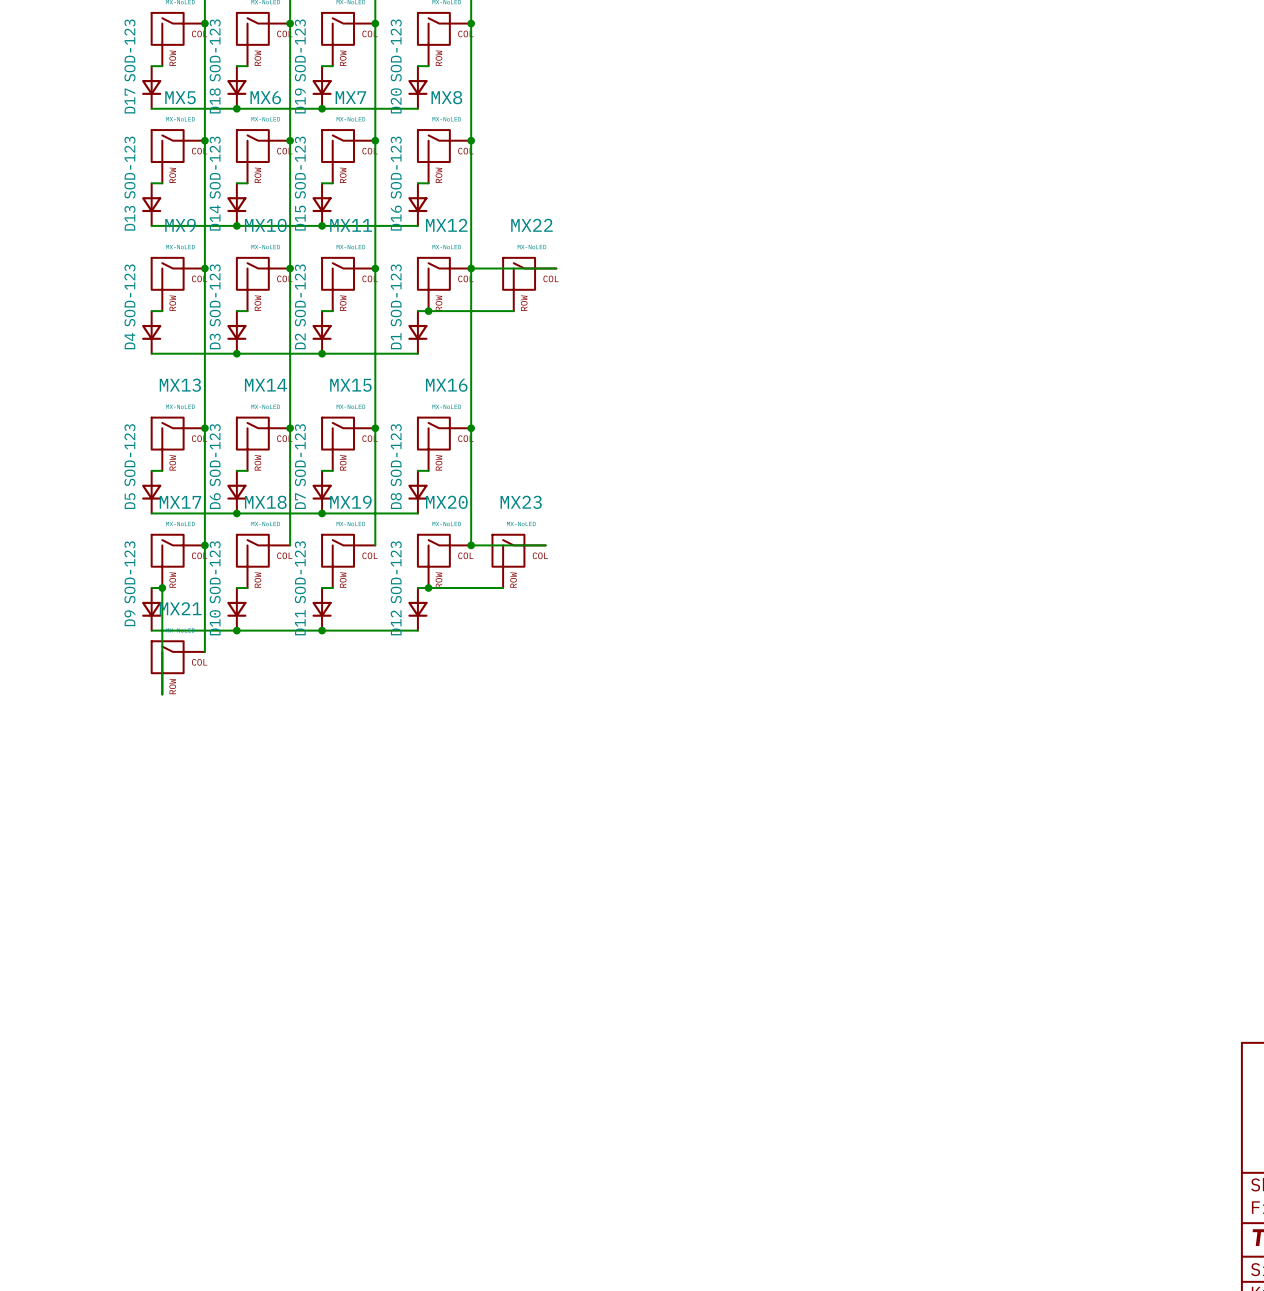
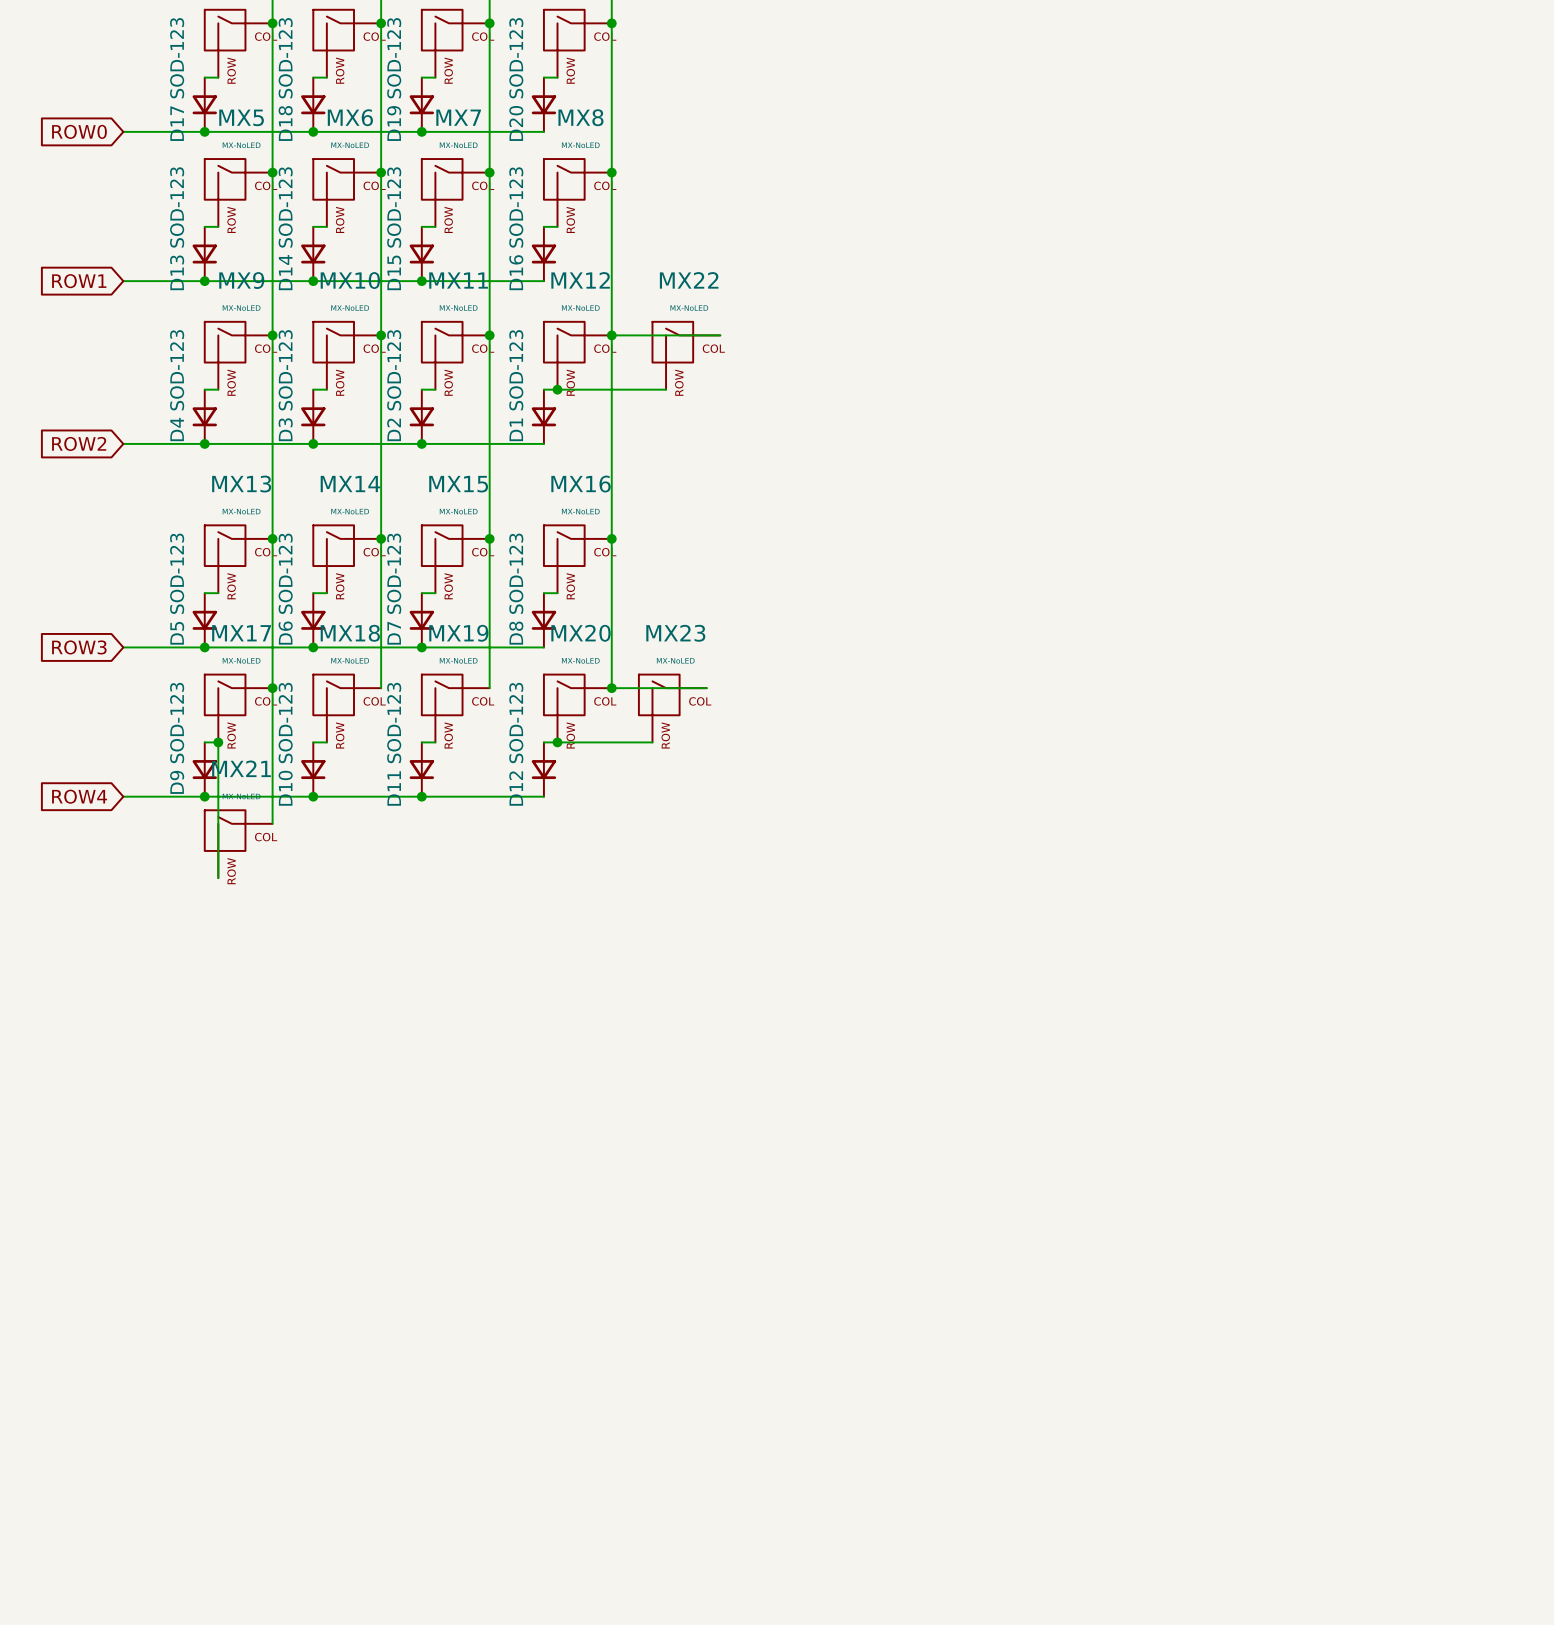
global label: none -> ROW0 (79, 131)
wire: none -> (123, 131) (204, 131)
junction: none -> (204, 131)
global label: none -> ROW1 (79, 281)
wire: none -> (123, 281) (204, 281)
junction: none -> (204, 281)
global label: none -> ROW2 (79, 443)
wire: none -> (123, 443) (204, 443)
junction: none -> (204, 443)
global label: none -> ROW3 (79, 647)
wire: none -> (123, 647) (204, 647)
junction: none -> (204, 647)
global label: none -> ROW4 (79, 796)
wire: none -> (123, 796) (204, 796)
junction: none -> (204, 796)

